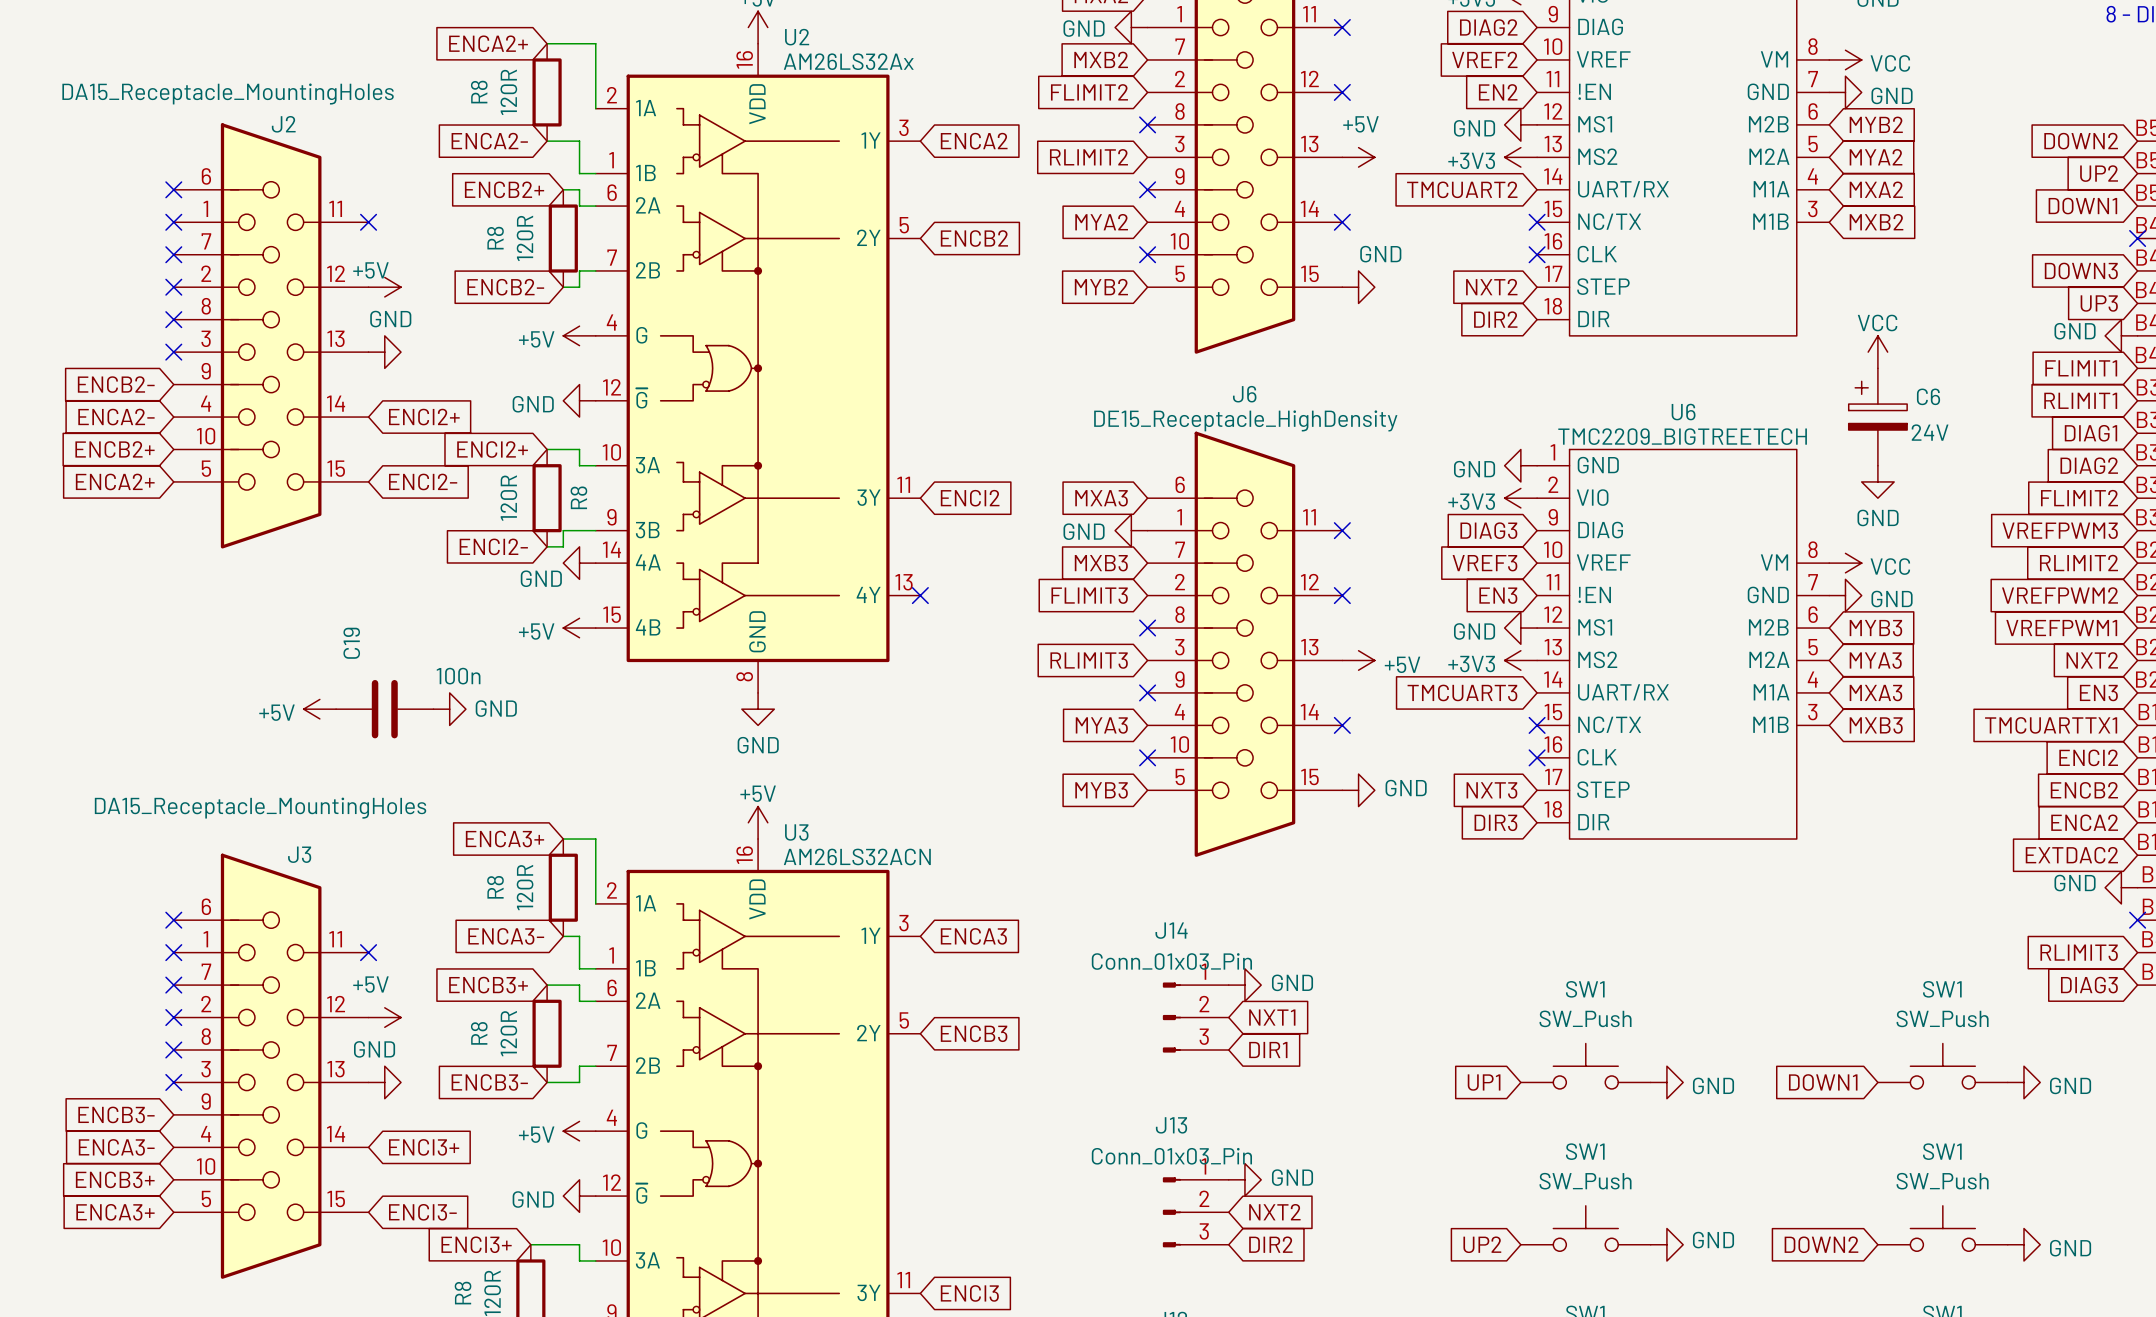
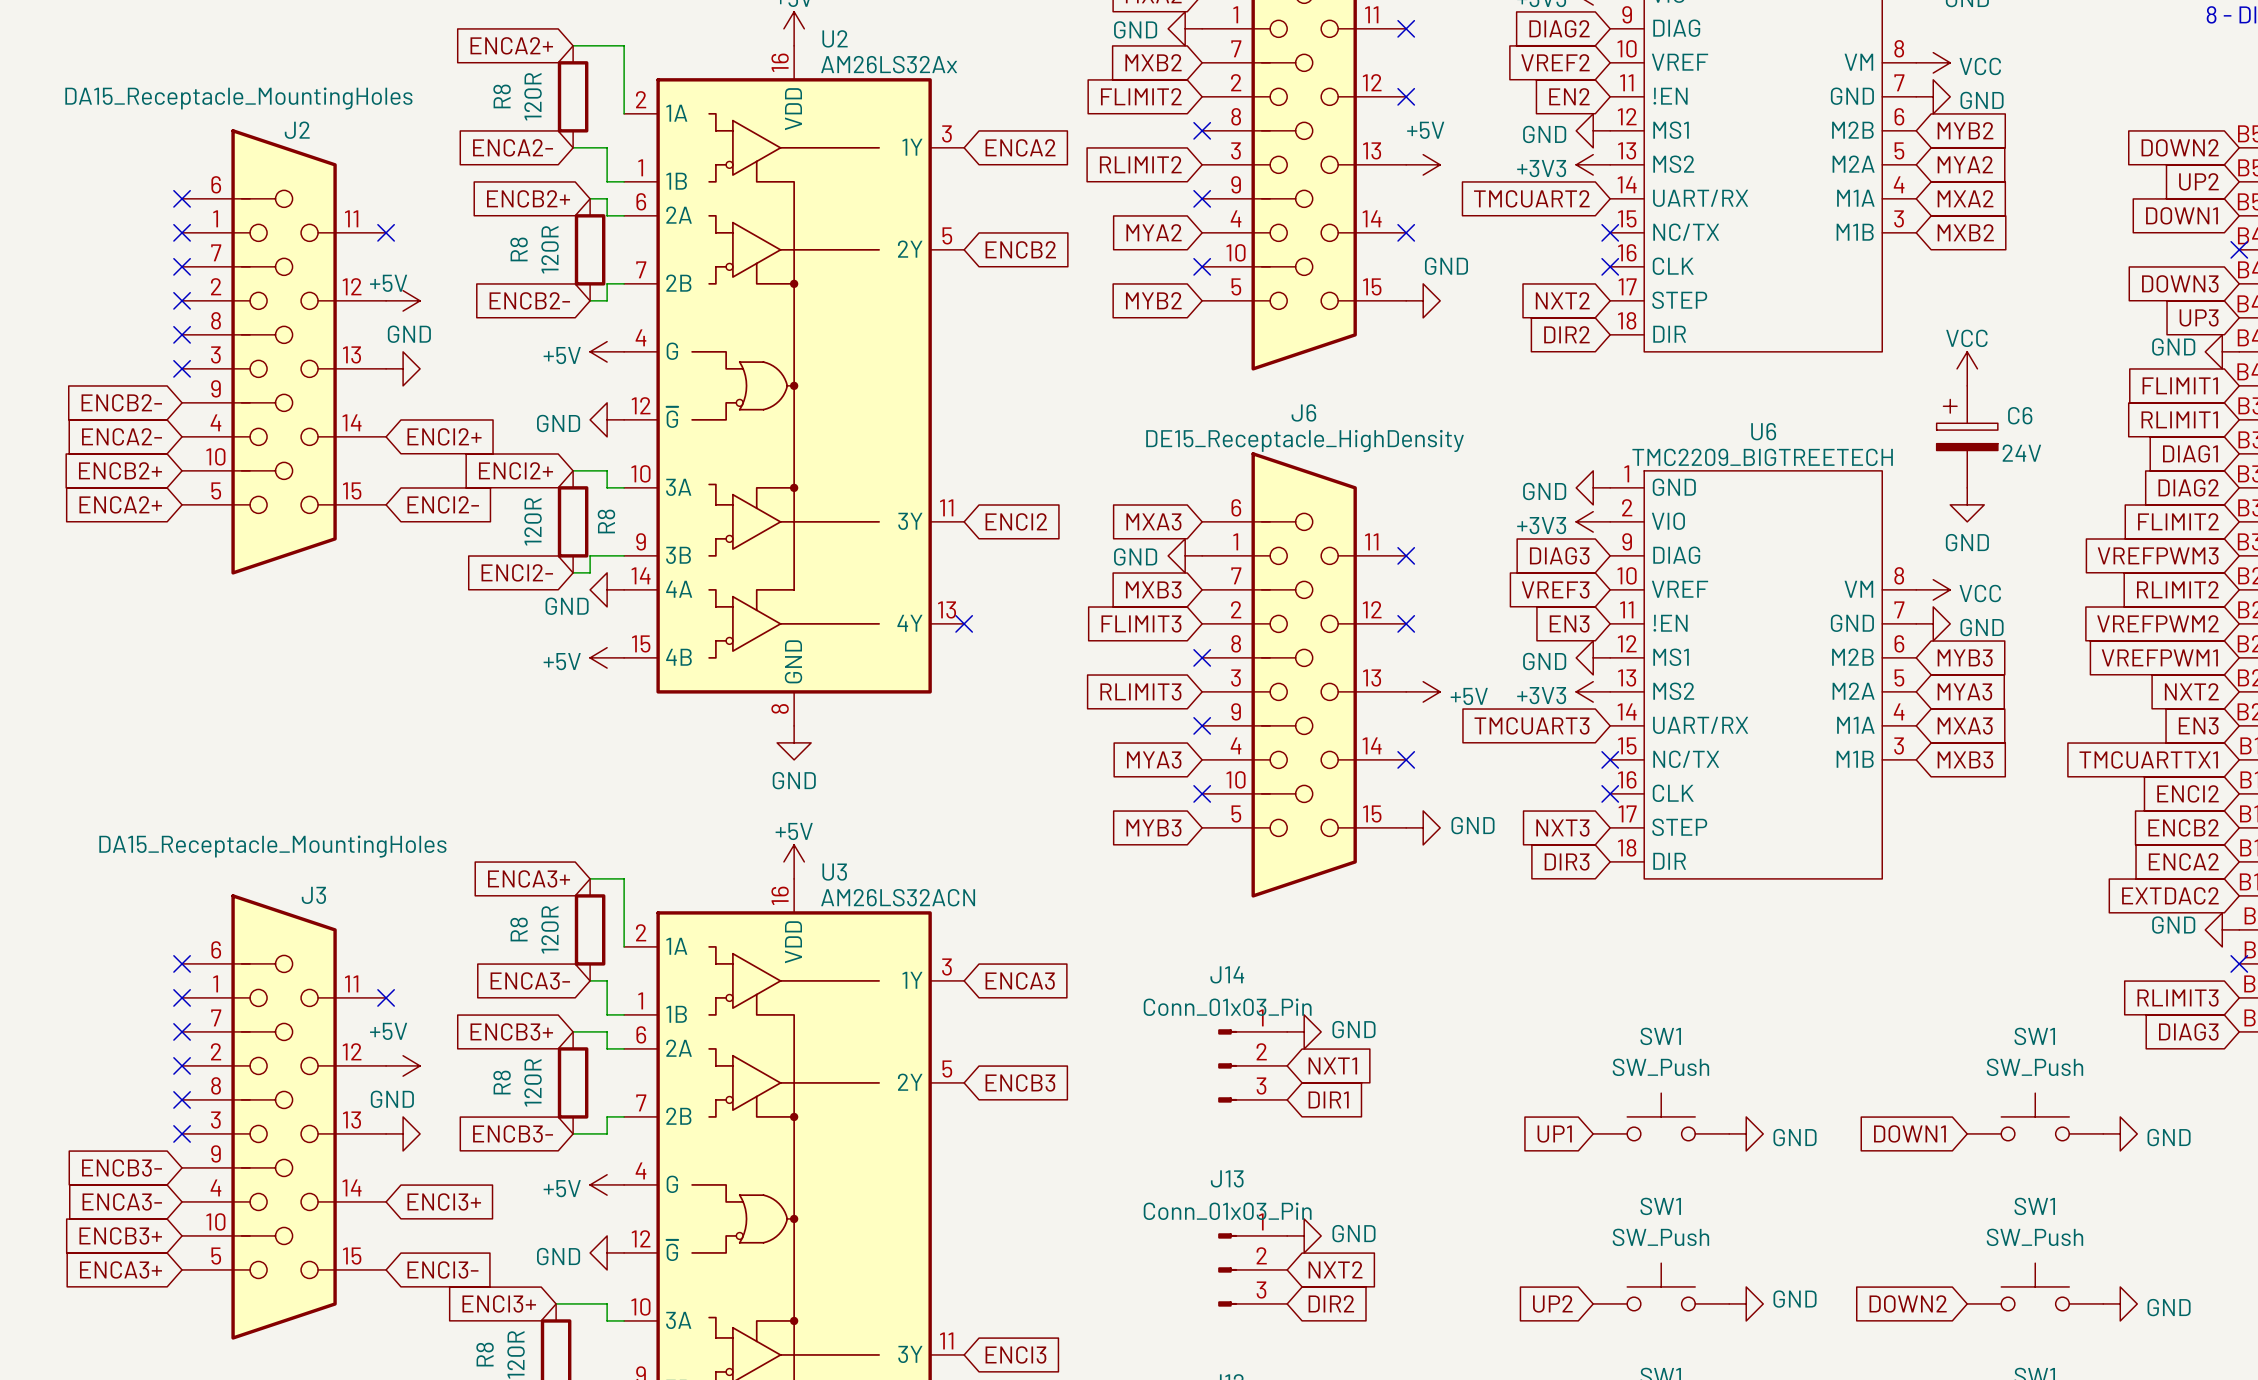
power symbol: +5V (319, 709) -> none
C19: 100n (384, 709) -> none
power symbol: GND (449, 709) -> none

